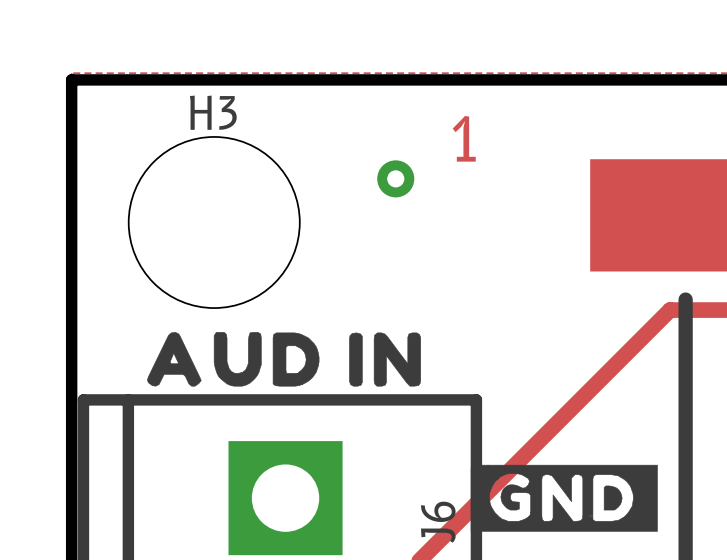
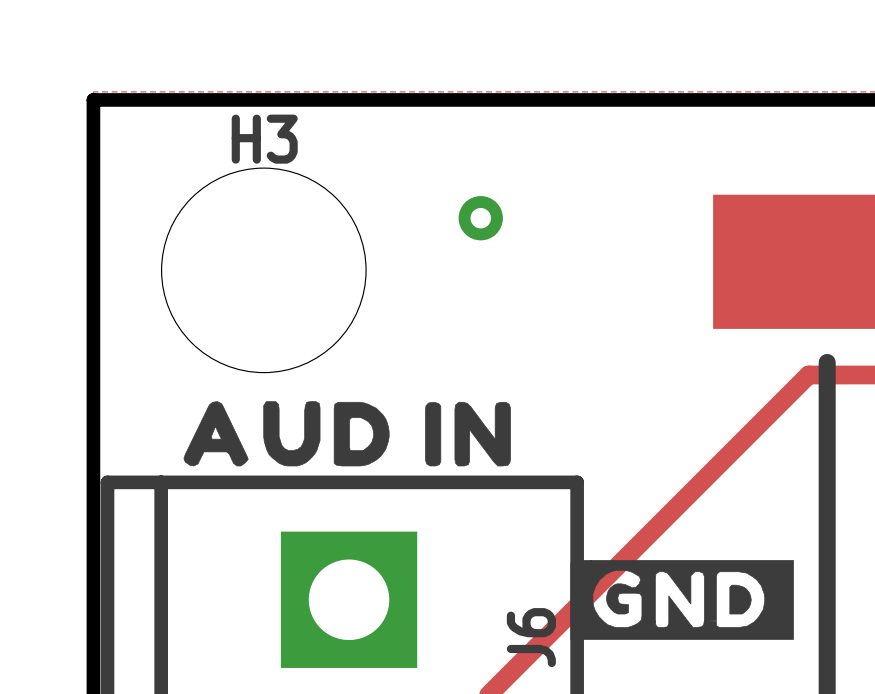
text: 1 (464, 138) -> none

